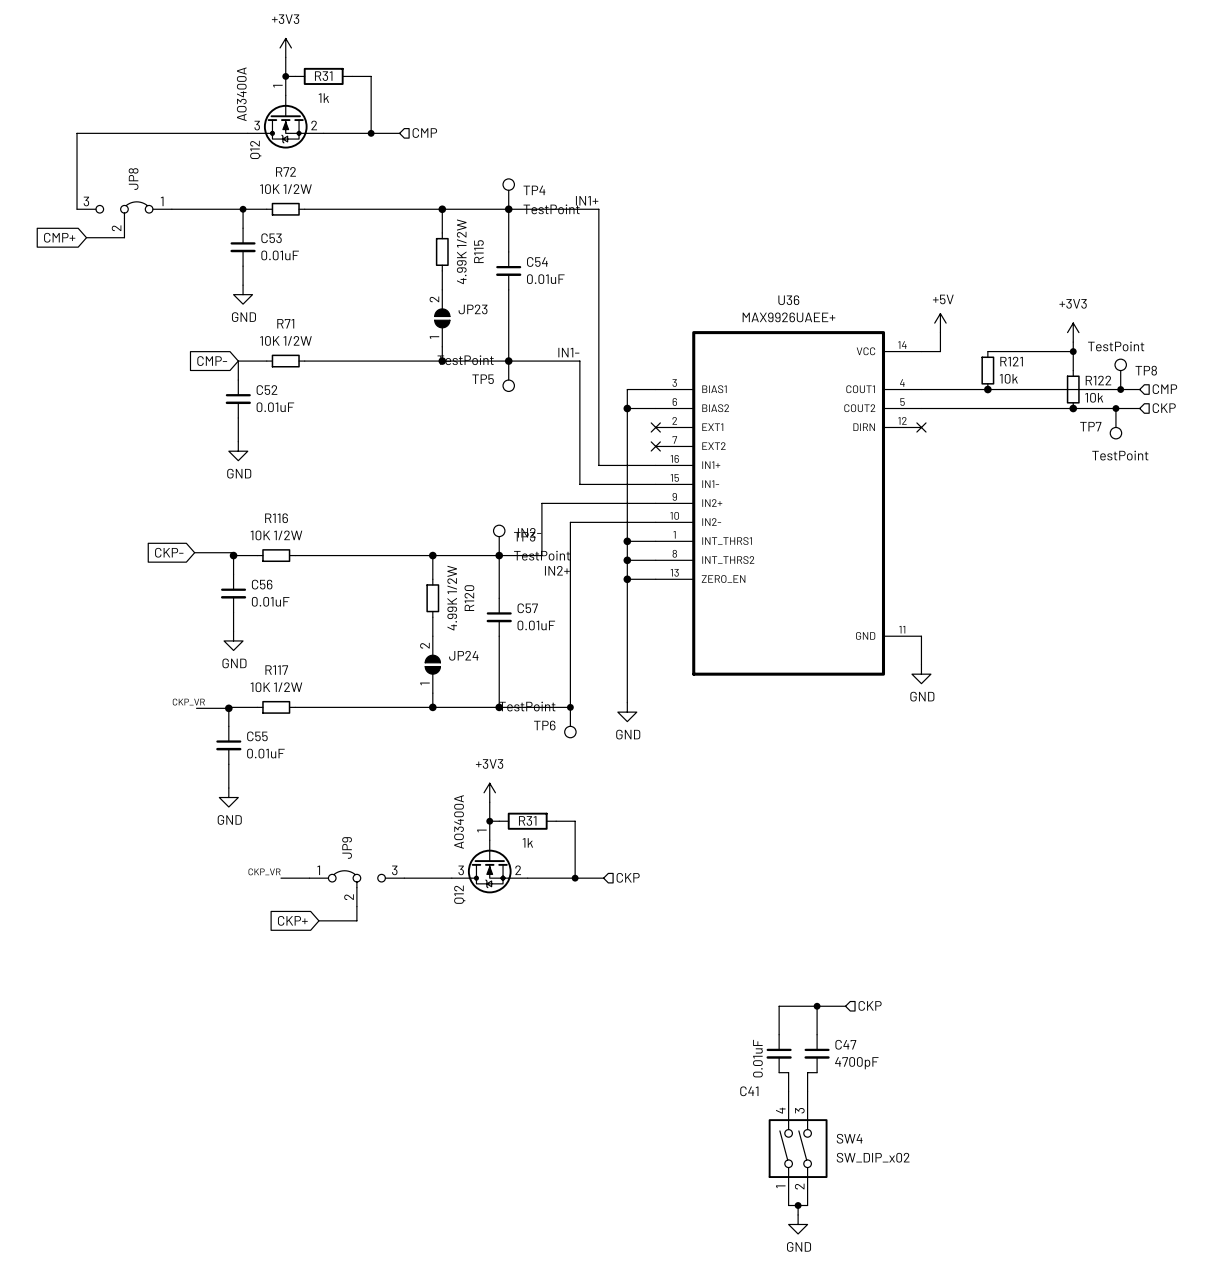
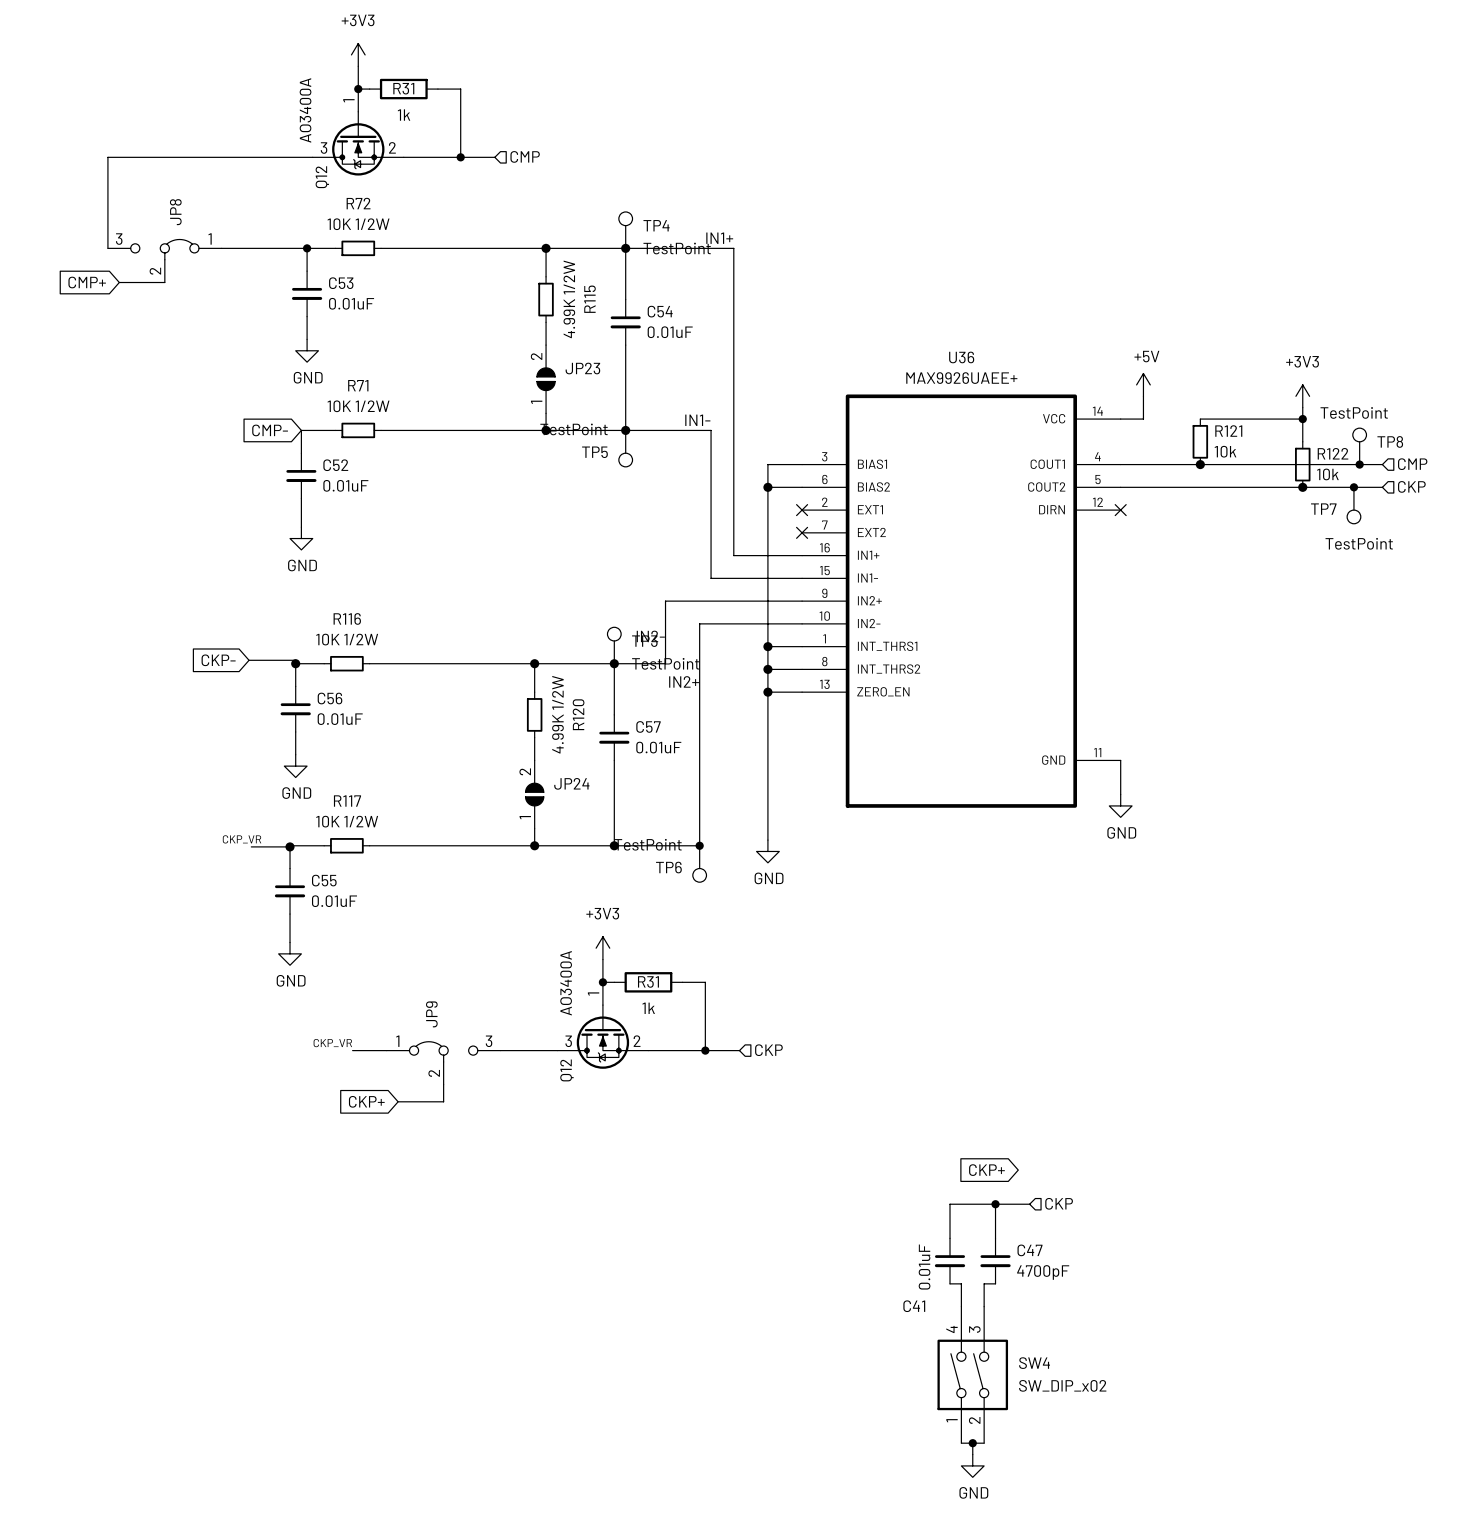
global label: none -> CKP+ (986, 1170)

